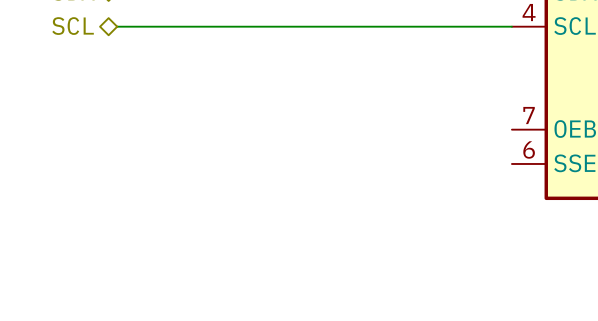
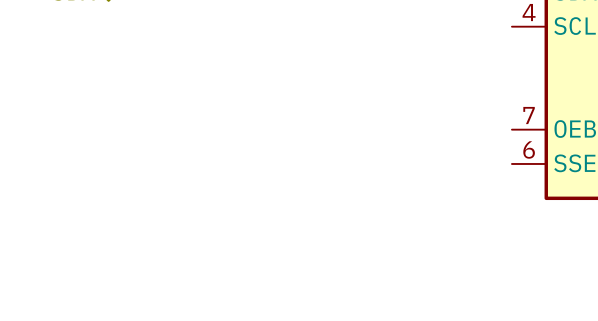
hierarchical label: SCL (73, 26) -> none
wire: (117, 26) (511, 26) -> none

